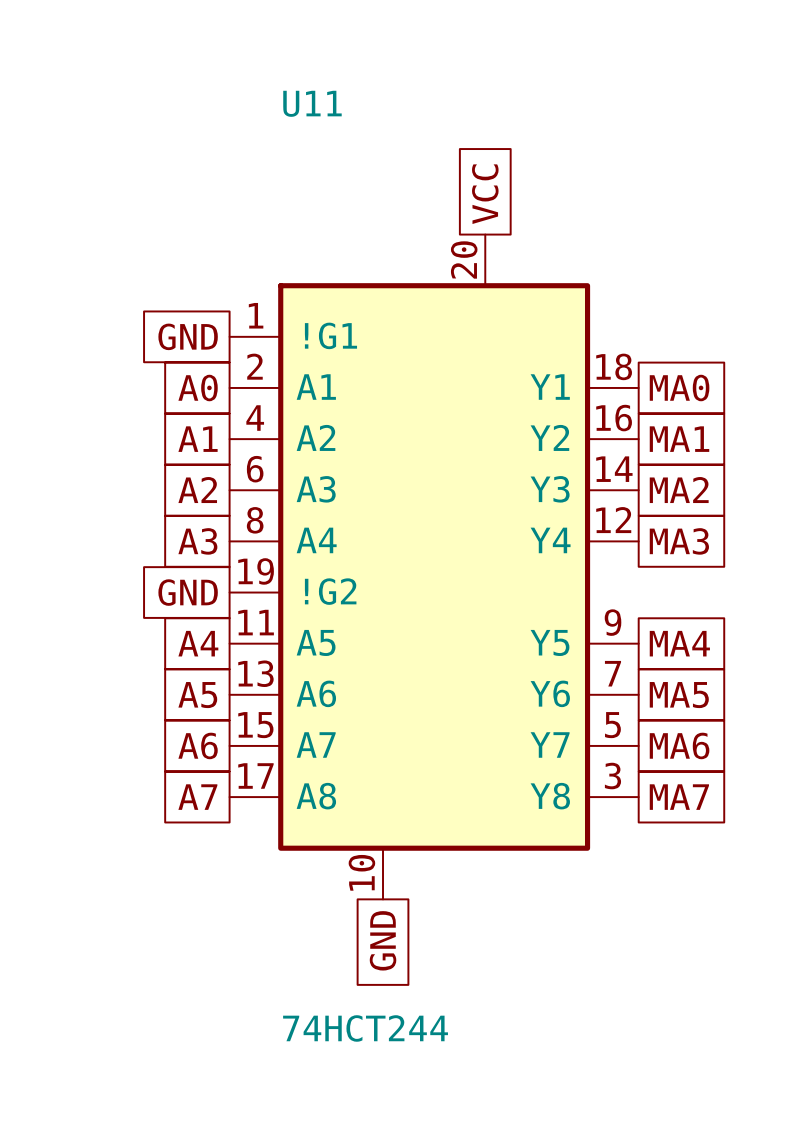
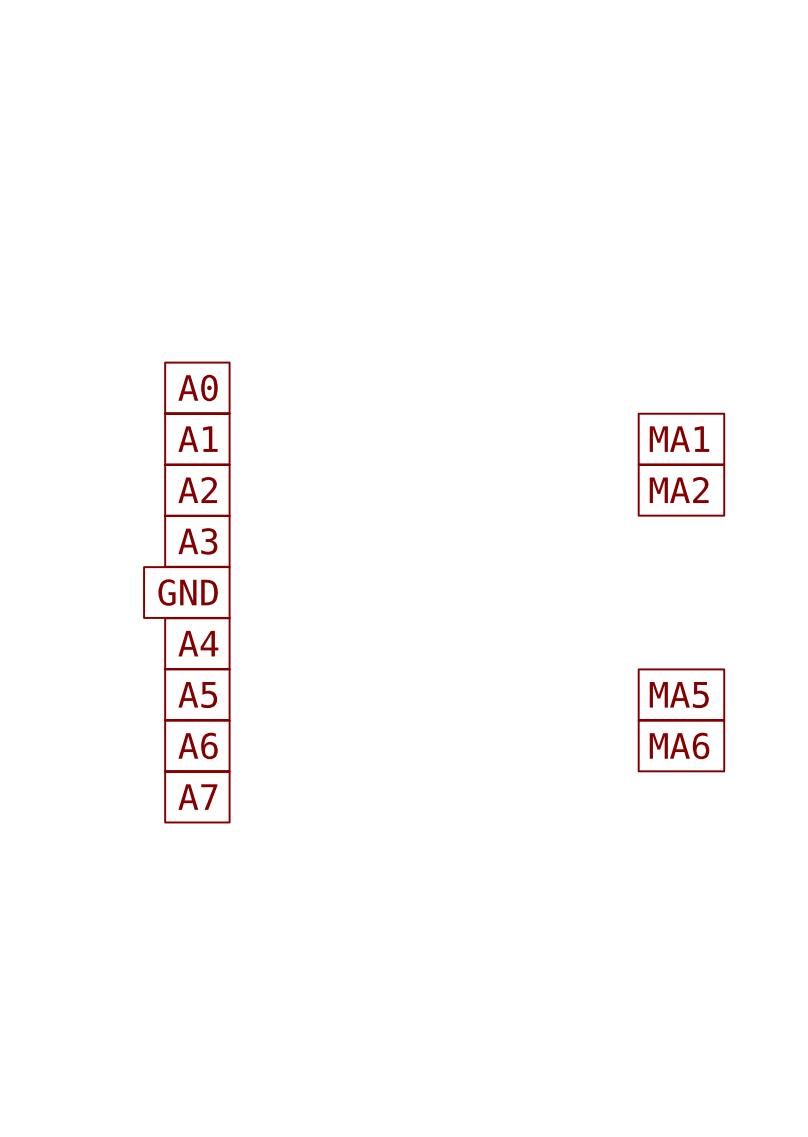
global label: VCC (485, 194) -> none
global label: GND (188, 336) -> none
global label: MA0 (679, 388) -> none
global label: MA3 (679, 541) -> none
U11: 74HCT244 (434, 566) -> none
global label: MA4 (679, 643) -> none
global label: MA7 (679, 797) -> none
global label: GND (383, 940) -> none

